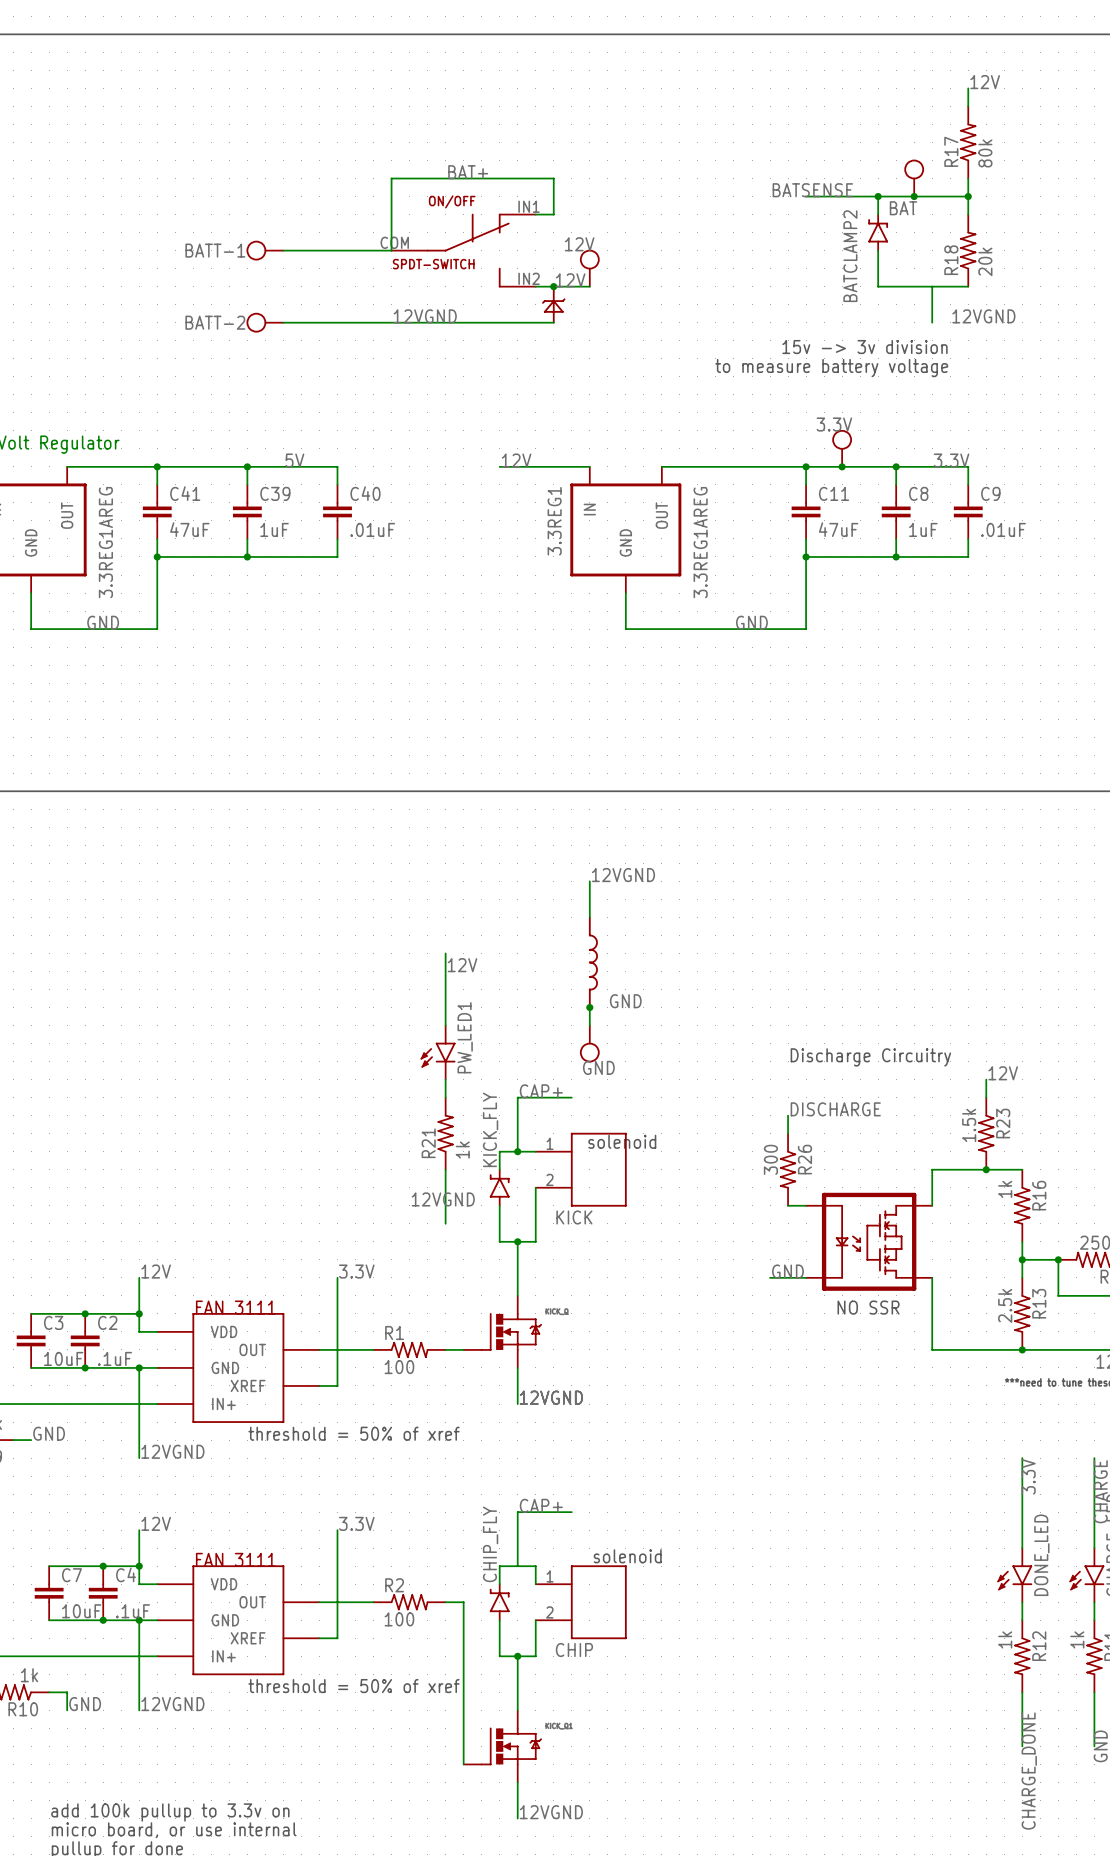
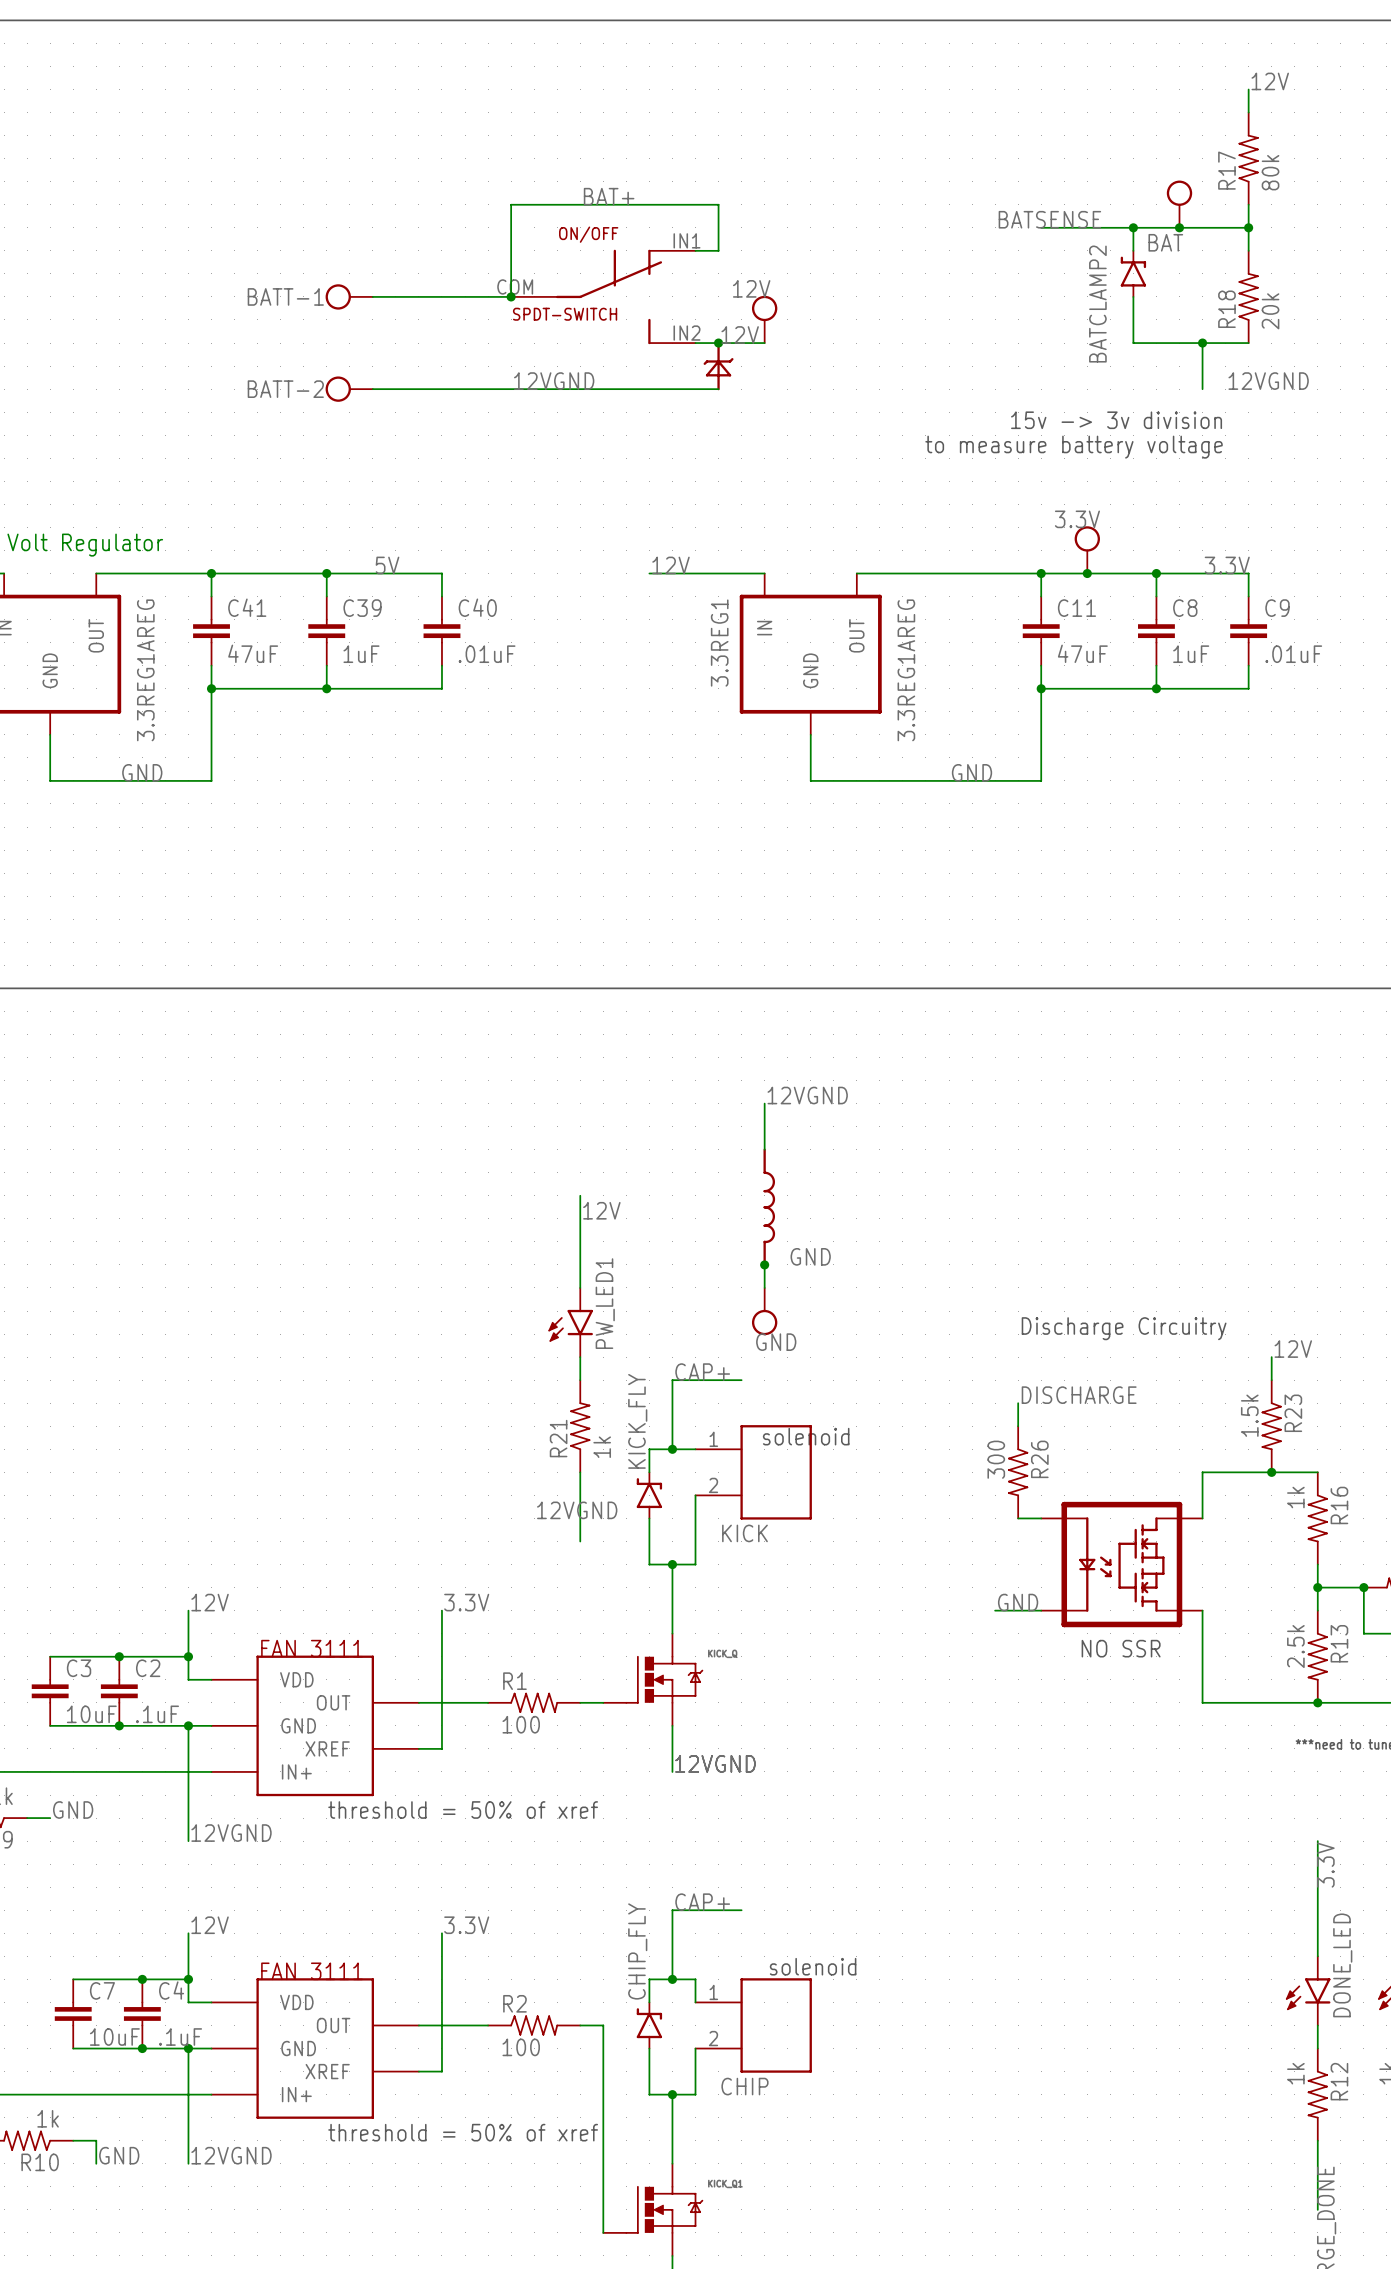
junction: none -> (511, 296)
junction: none -> (1202, 343)
junction: none -> (672, 1979)

